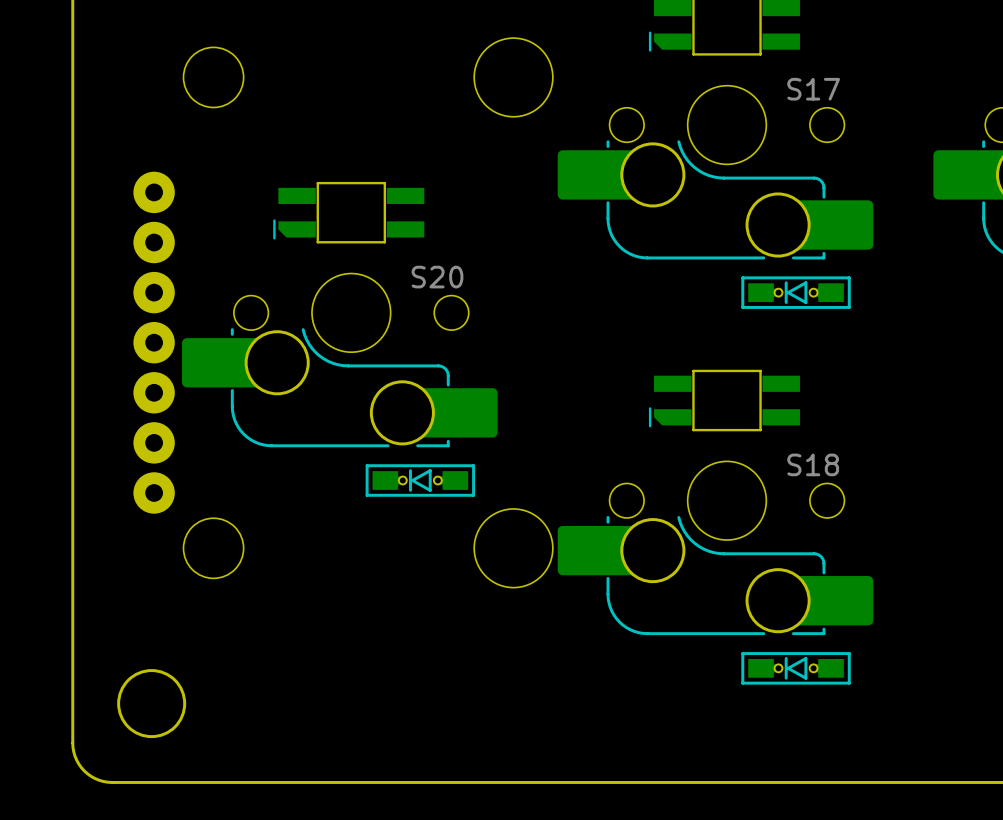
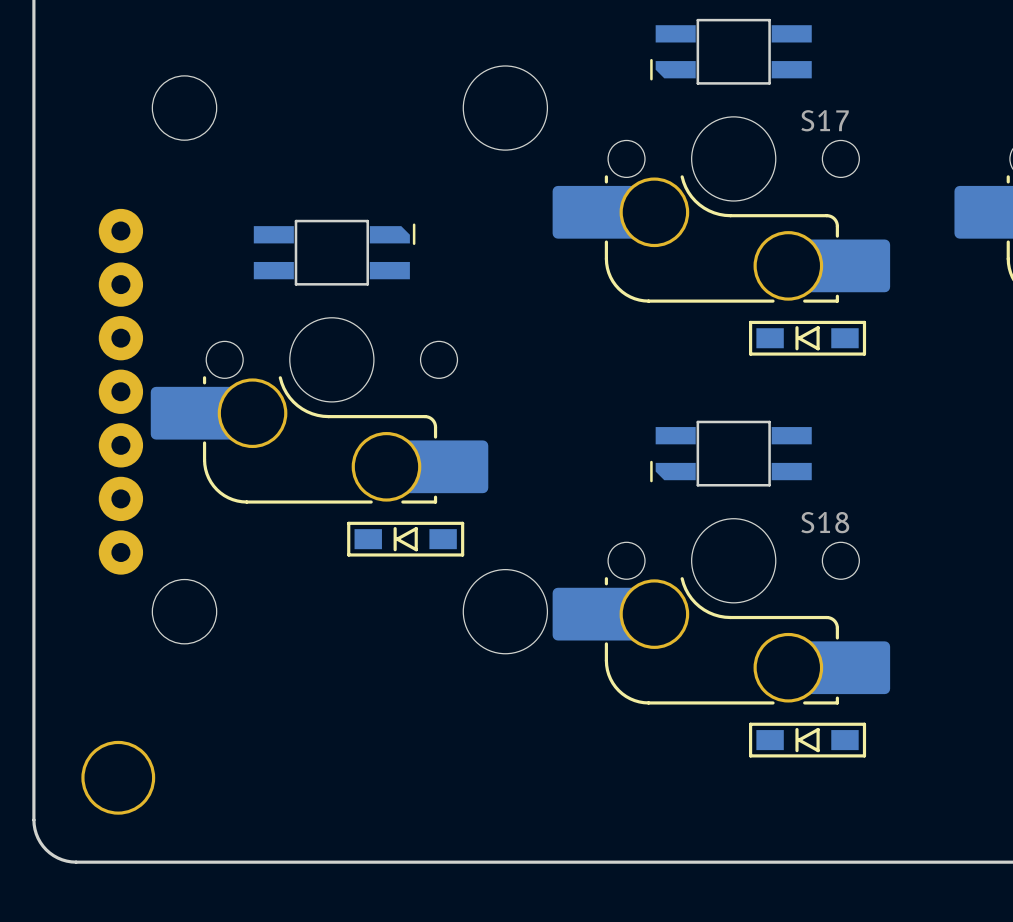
part footprint: [273, 181, 425, 244] -> [253, 219, 416, 286]
part footprint: [741, 276, 851, 309] -> [749, 320, 867, 356]
part text: S20 (437, 277) -> none
part footprint: [365, 464, 476, 497] -> [347, 521, 465, 557]
part footprint: [741, 652, 851, 685] -> [749, 722, 867, 758]

